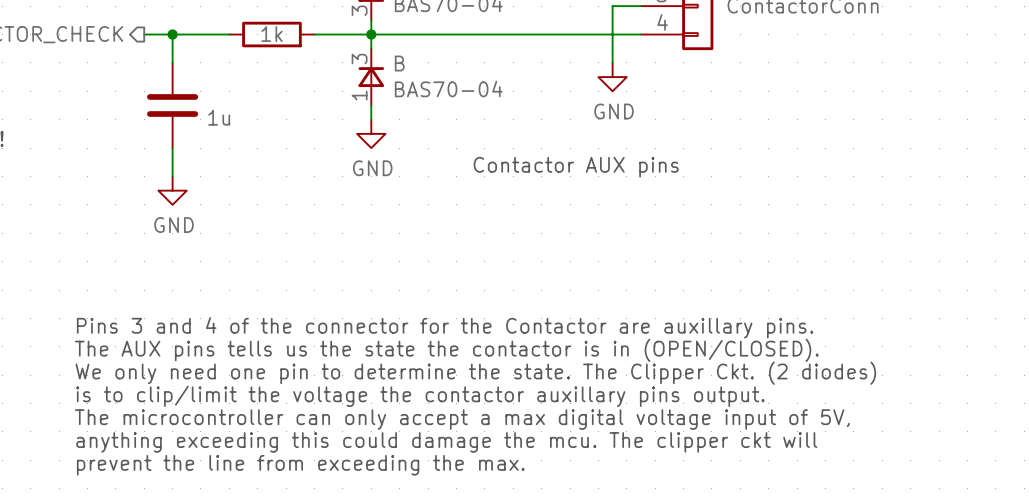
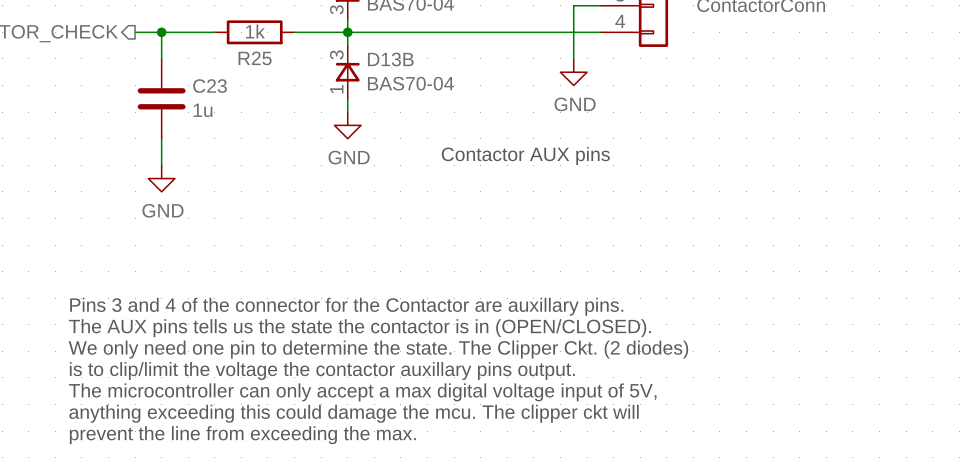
R25 name: none -> R25 (255, 58)
B name: B (399, 63) -> D13B (390, 59)
C23 name: none -> C23 (210, 86)

